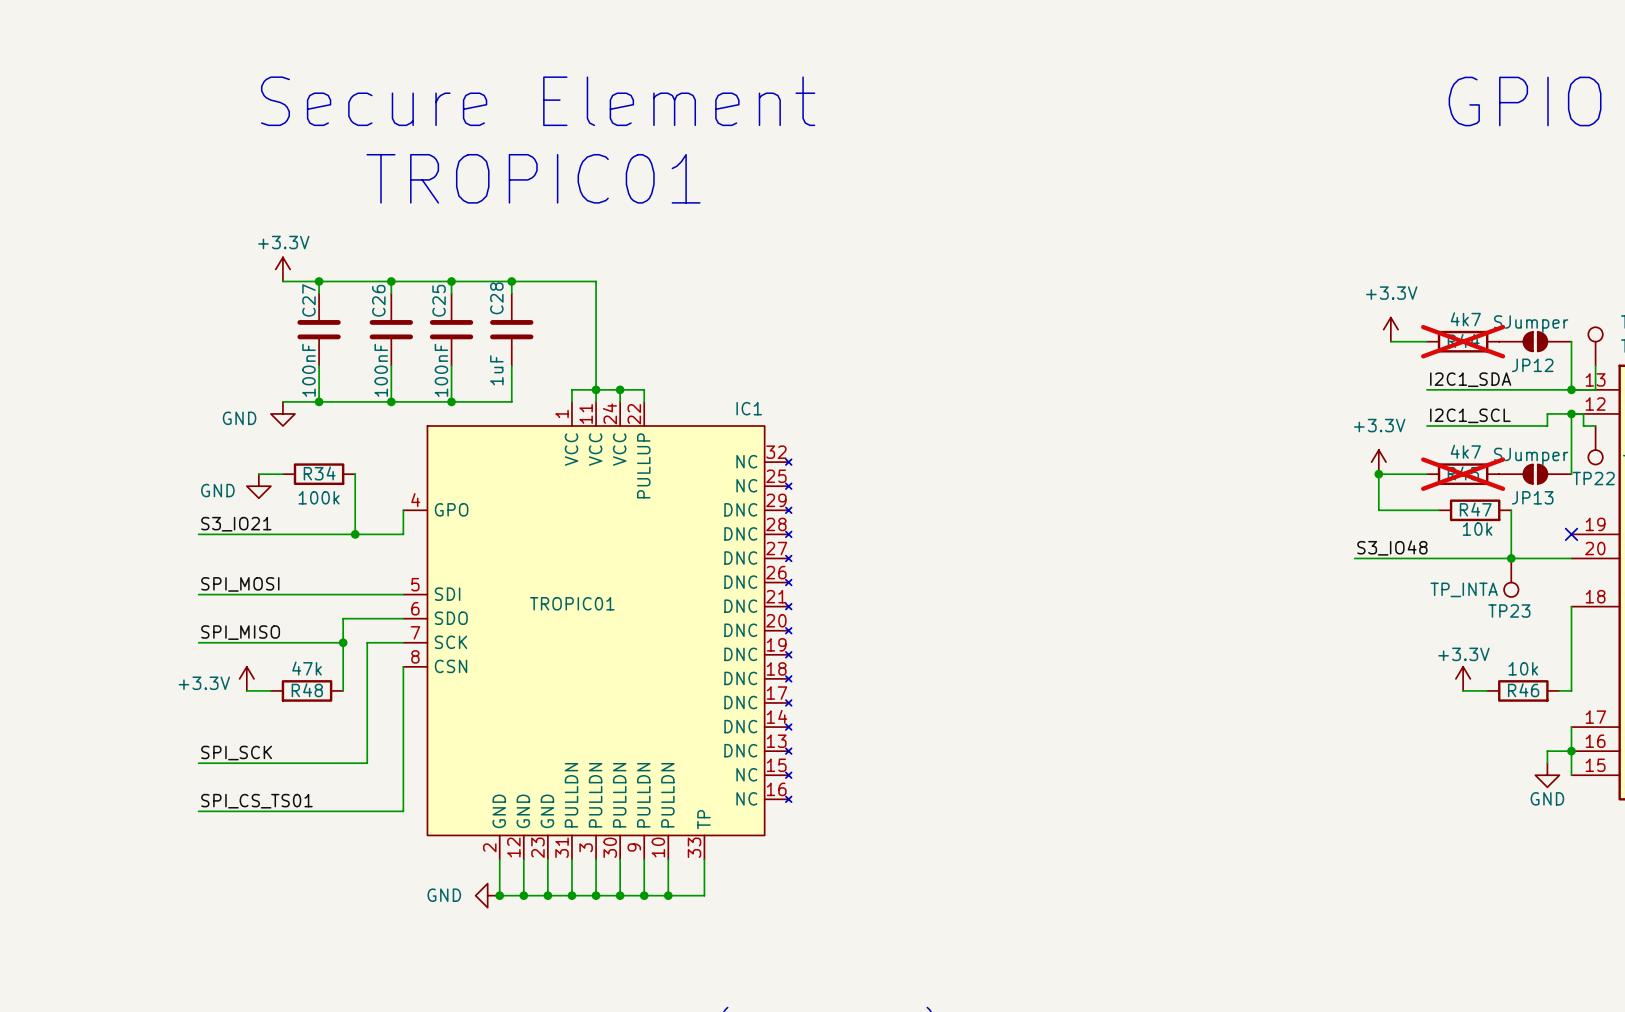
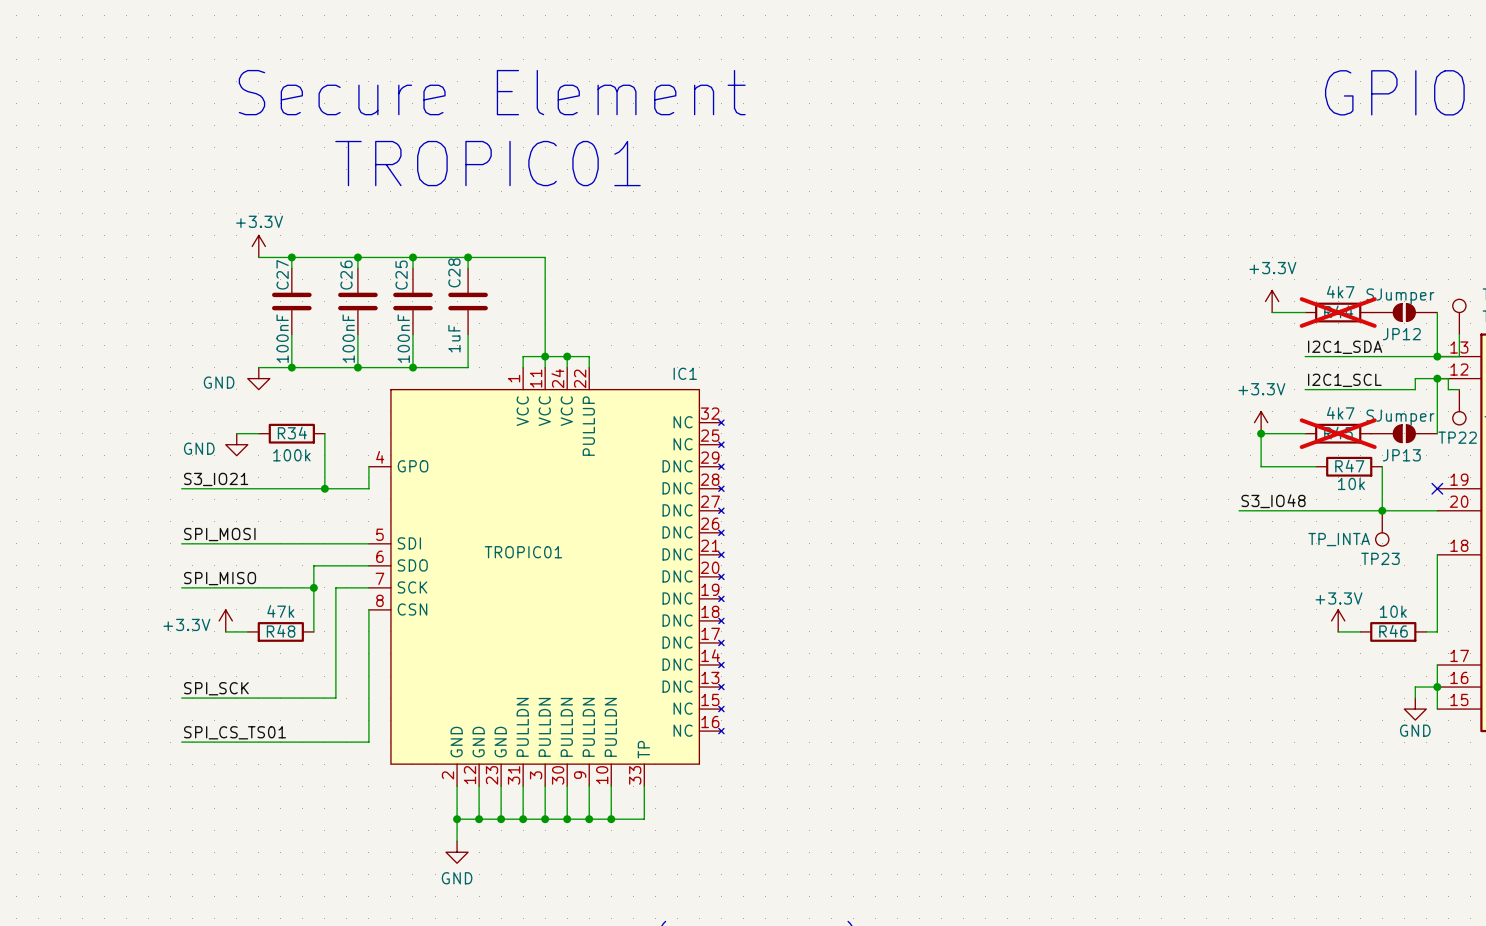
power symbol rotation: 0° (487, 895) -> 90° counterclockwise (457, 852)
power symbol position: GND (487, 895) -> GND (457, 852)
wire: none -> (457, 819) (457, 841)

